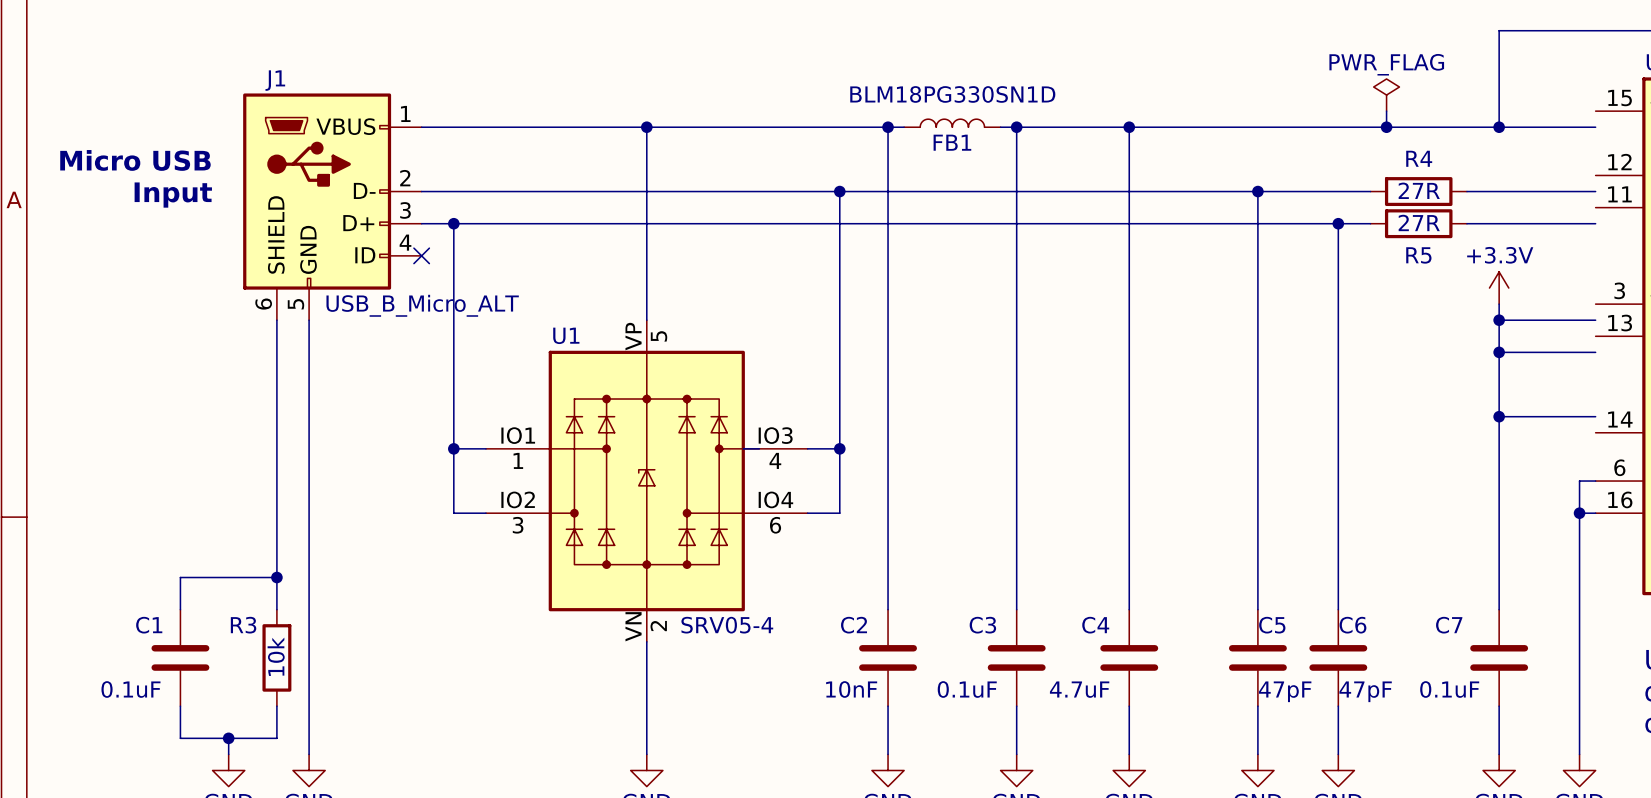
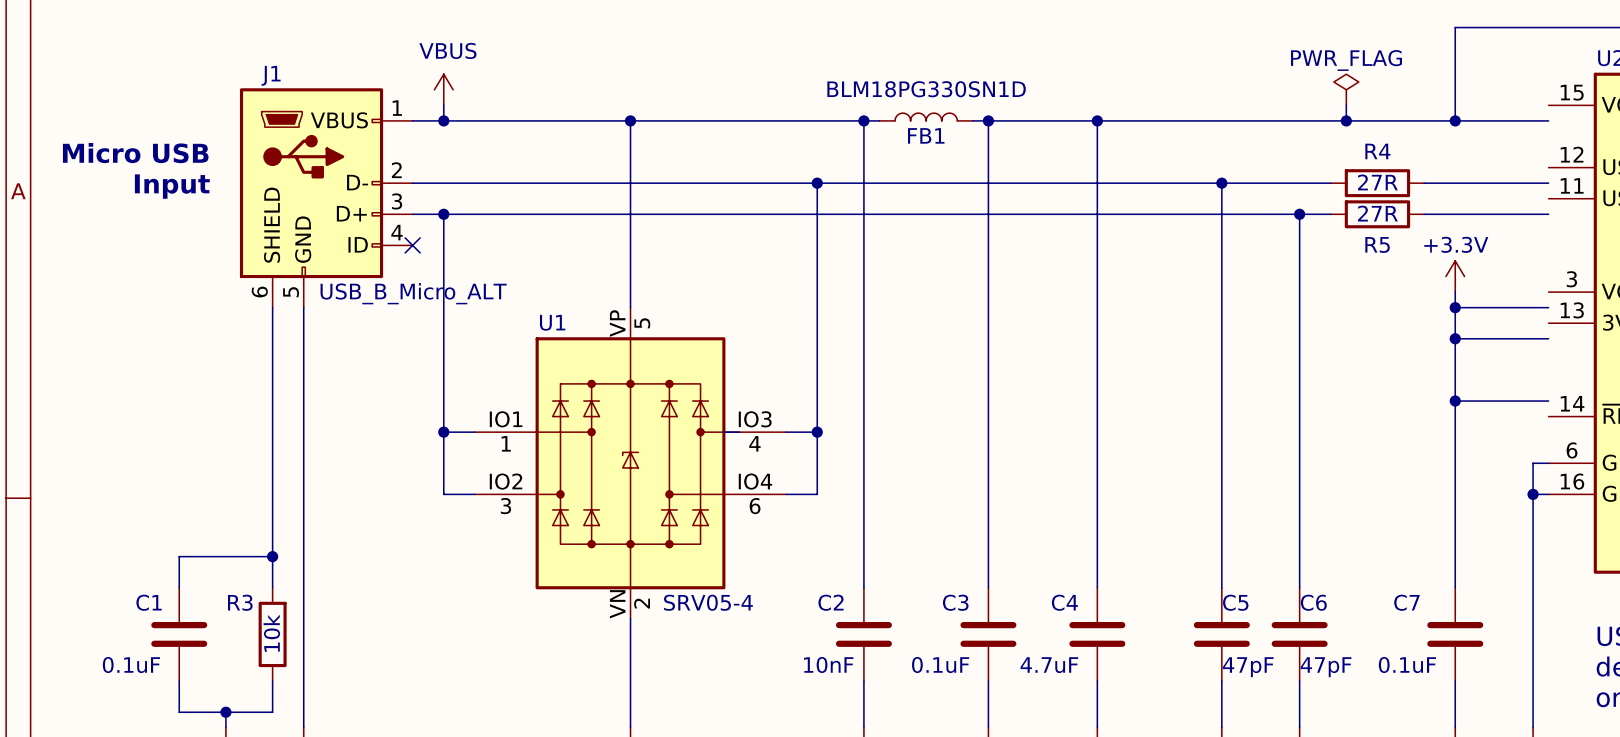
power symbol: none -> VBUS (443, 89)
wire: none -> (443, 105) (443, 120)
junction: none -> (443, 120)

